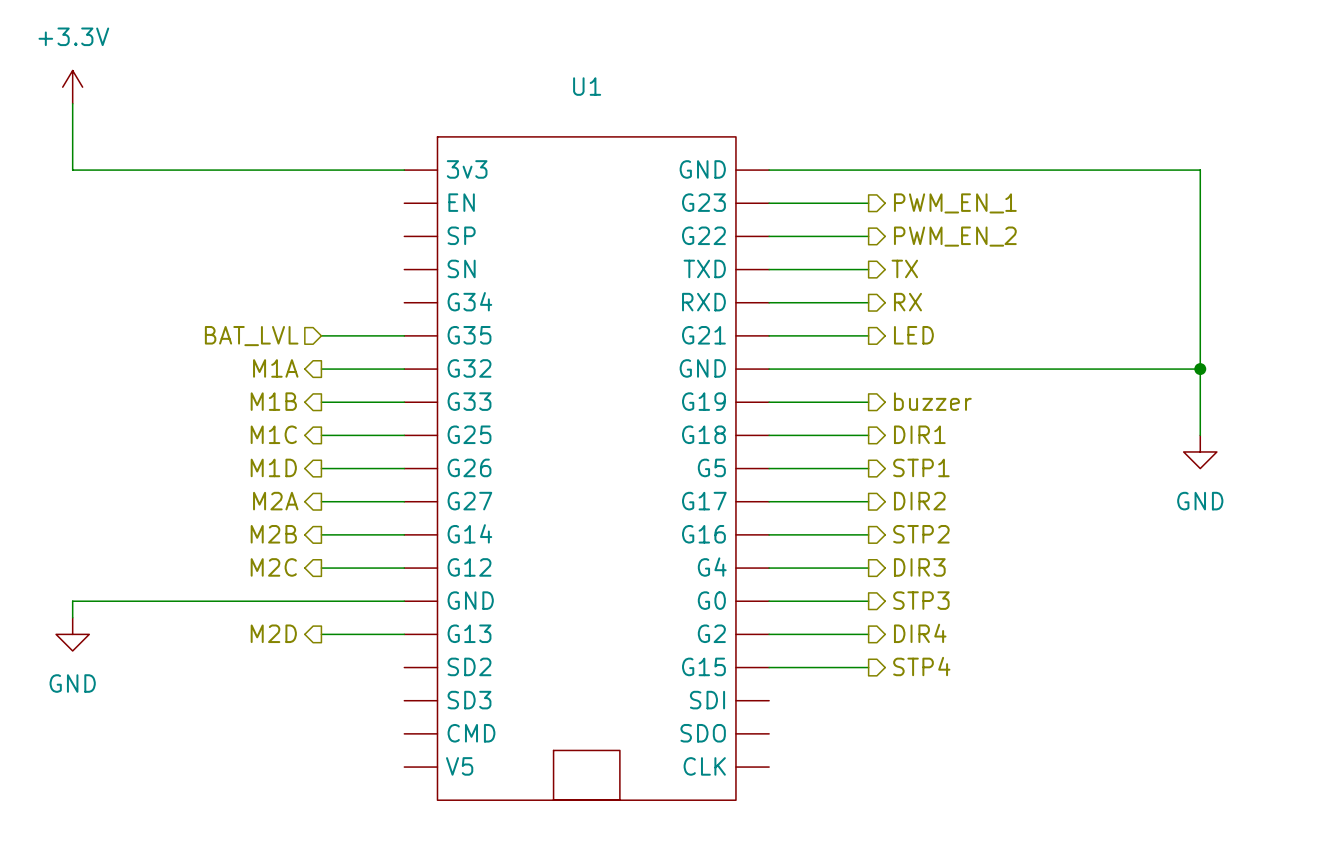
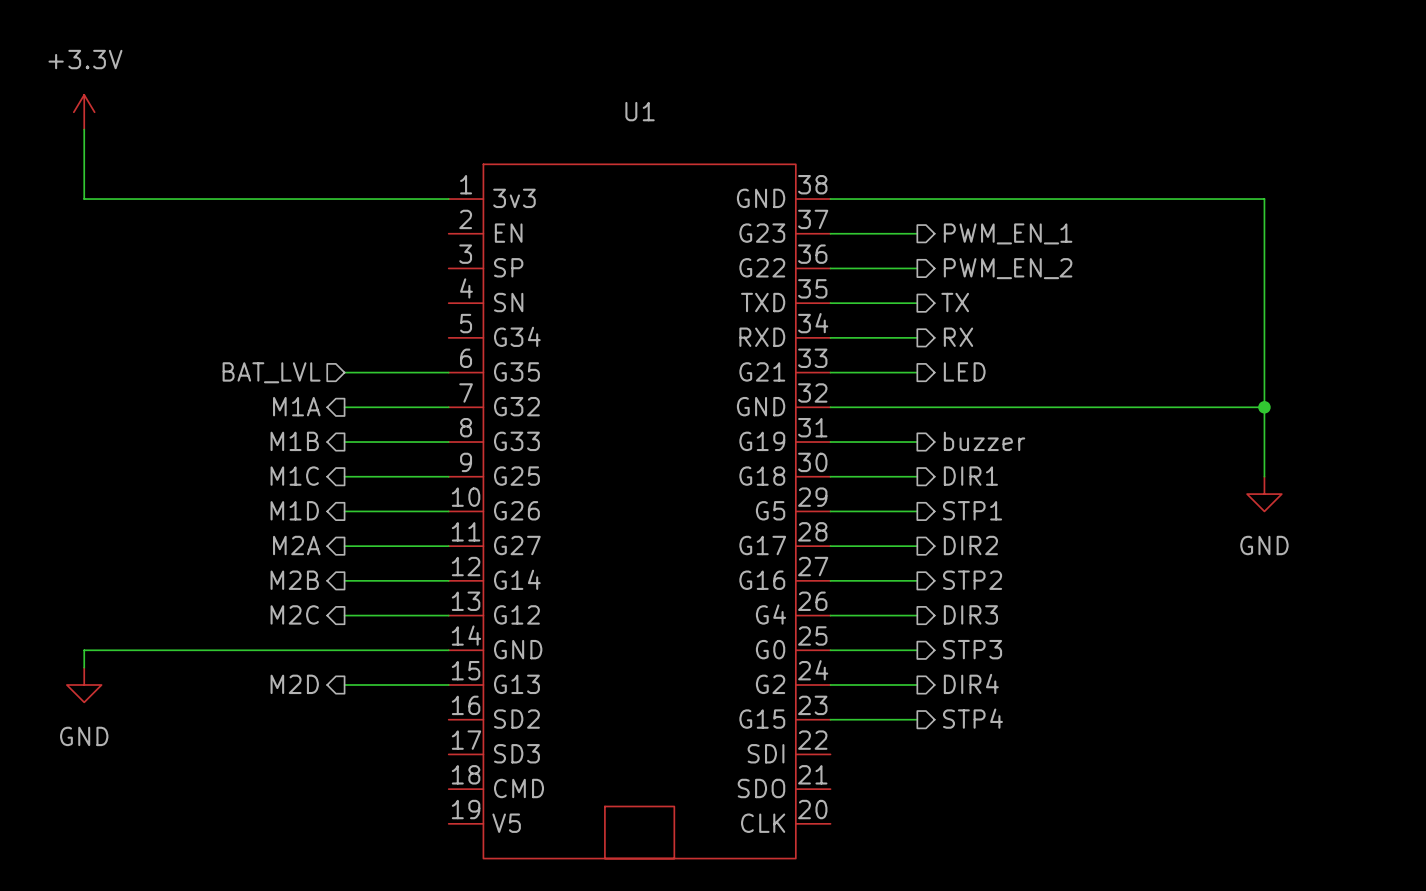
U1 symbol: [404, 136, 770, 801] -> [448, 164, 831, 859]

